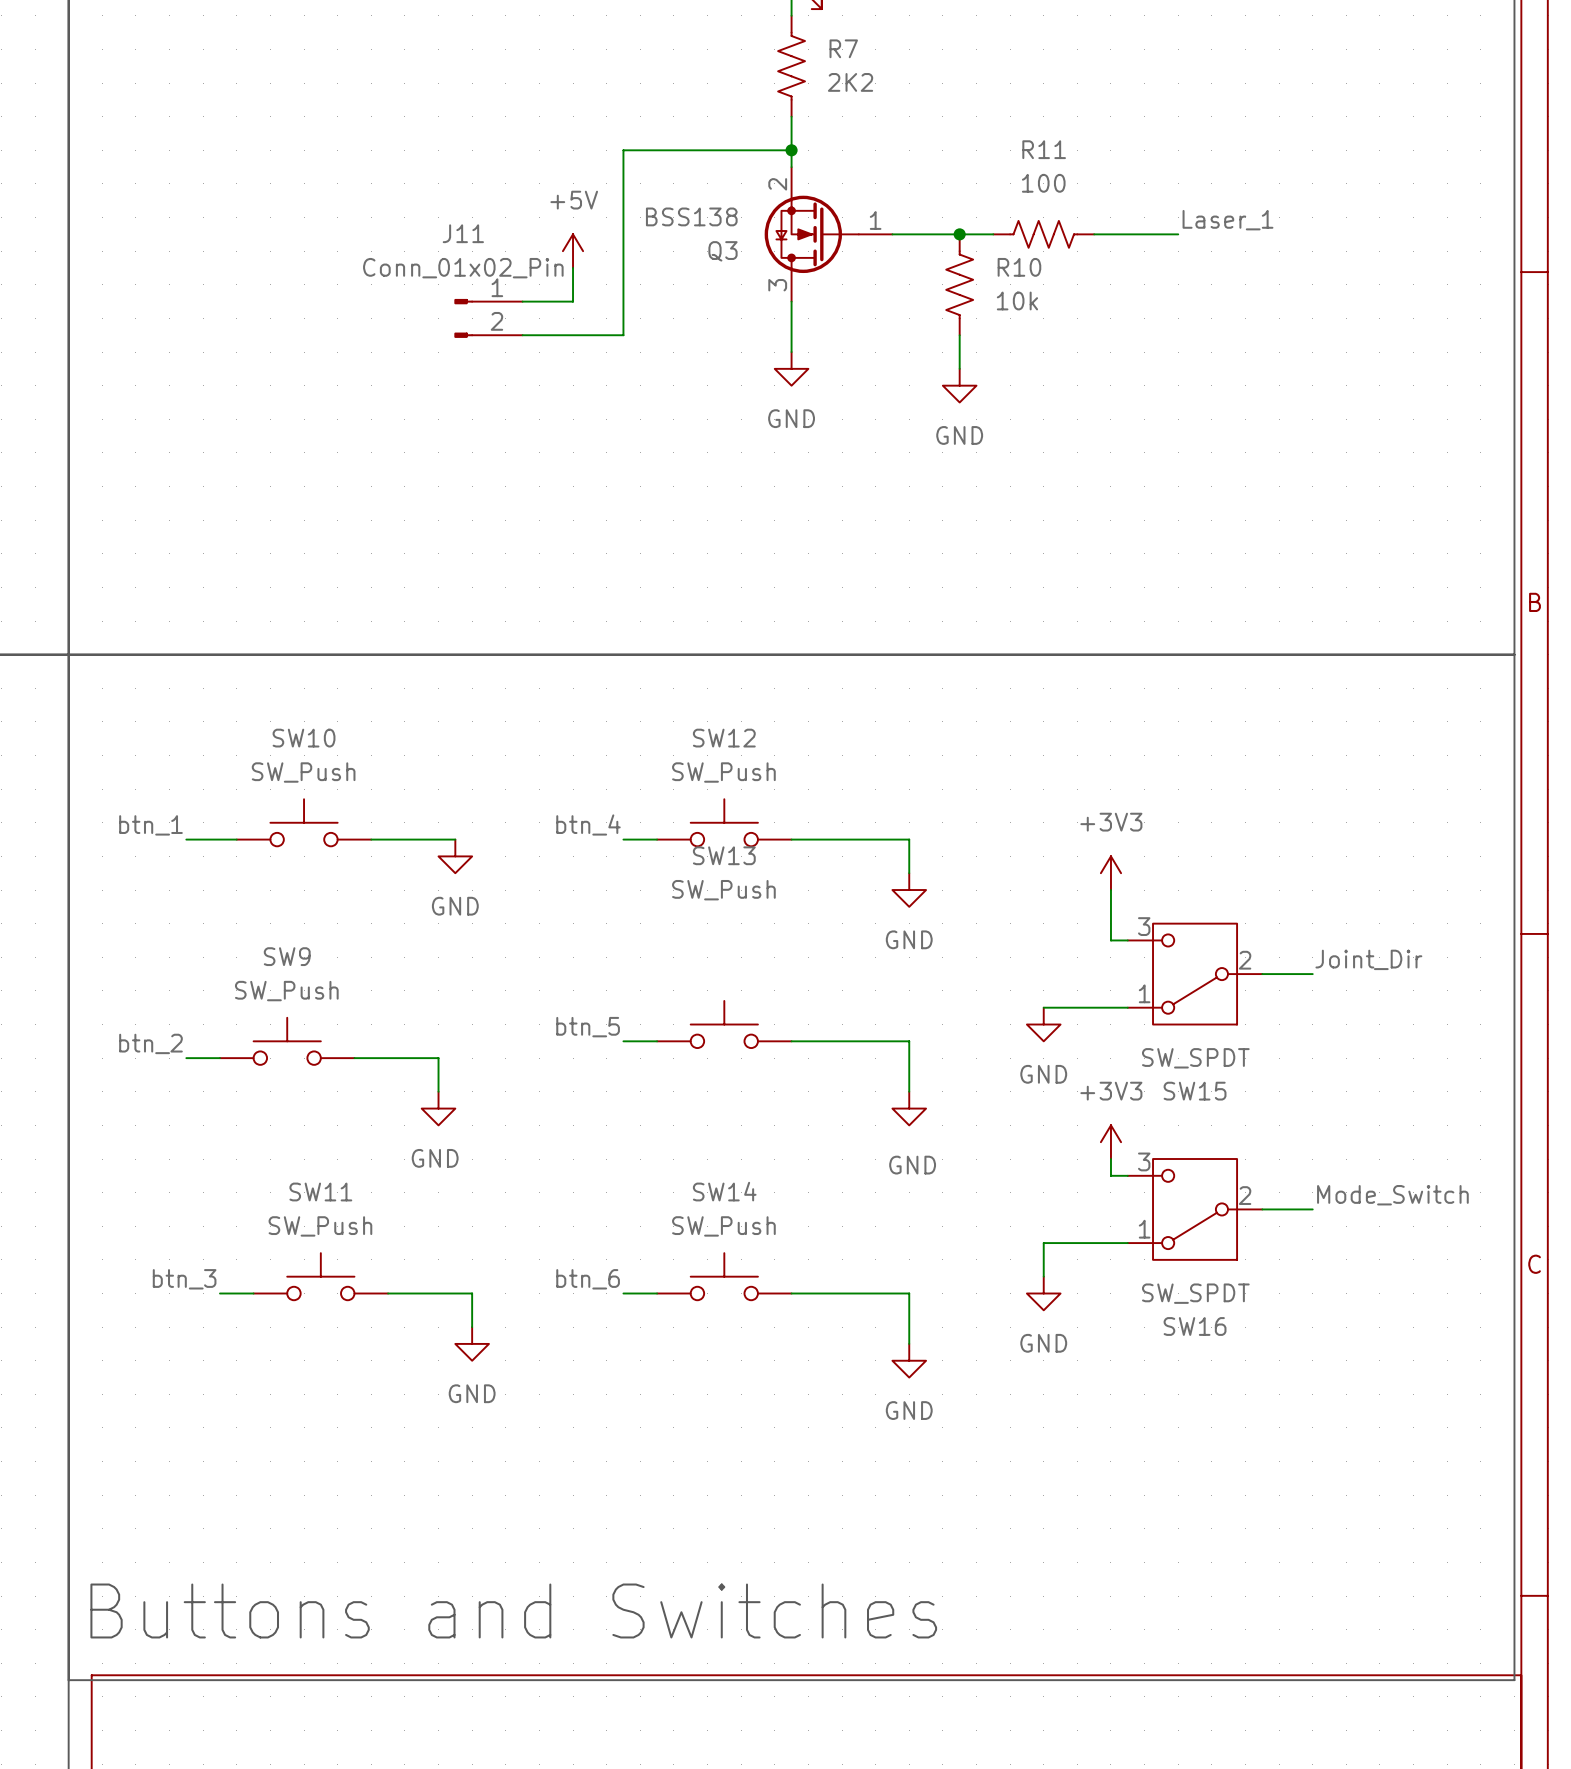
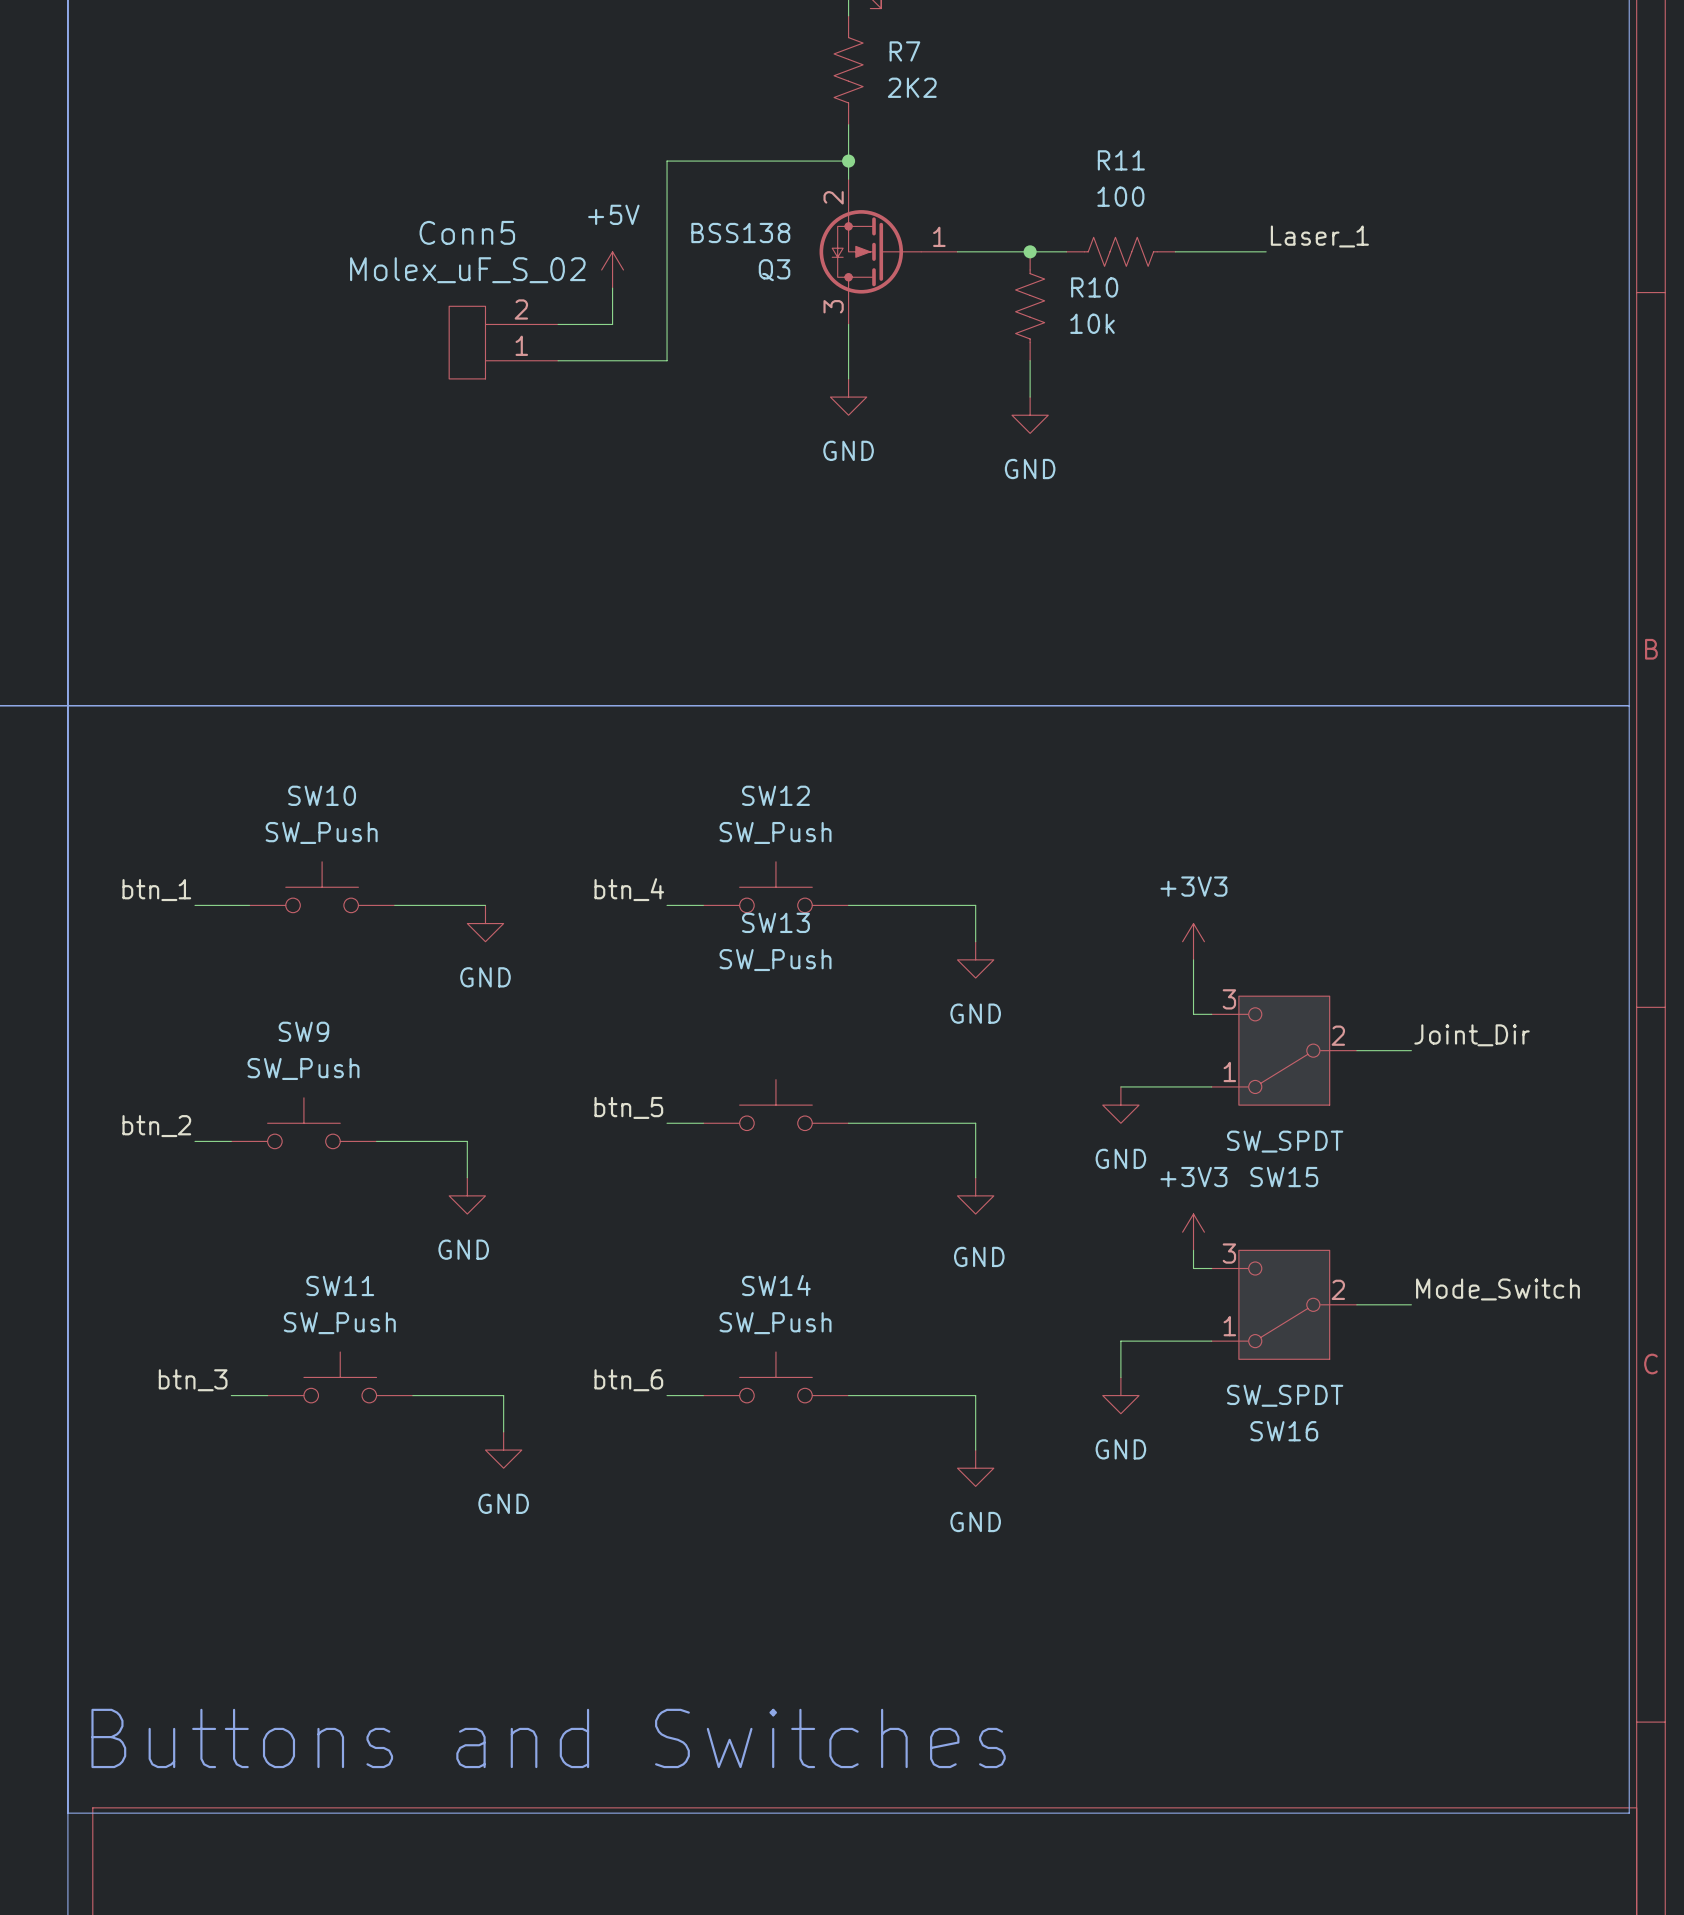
Conn5: none -> Molex_uF_S_02 (503, 342)
J11: Conn_01x02_Pin (488, 318) -> none

